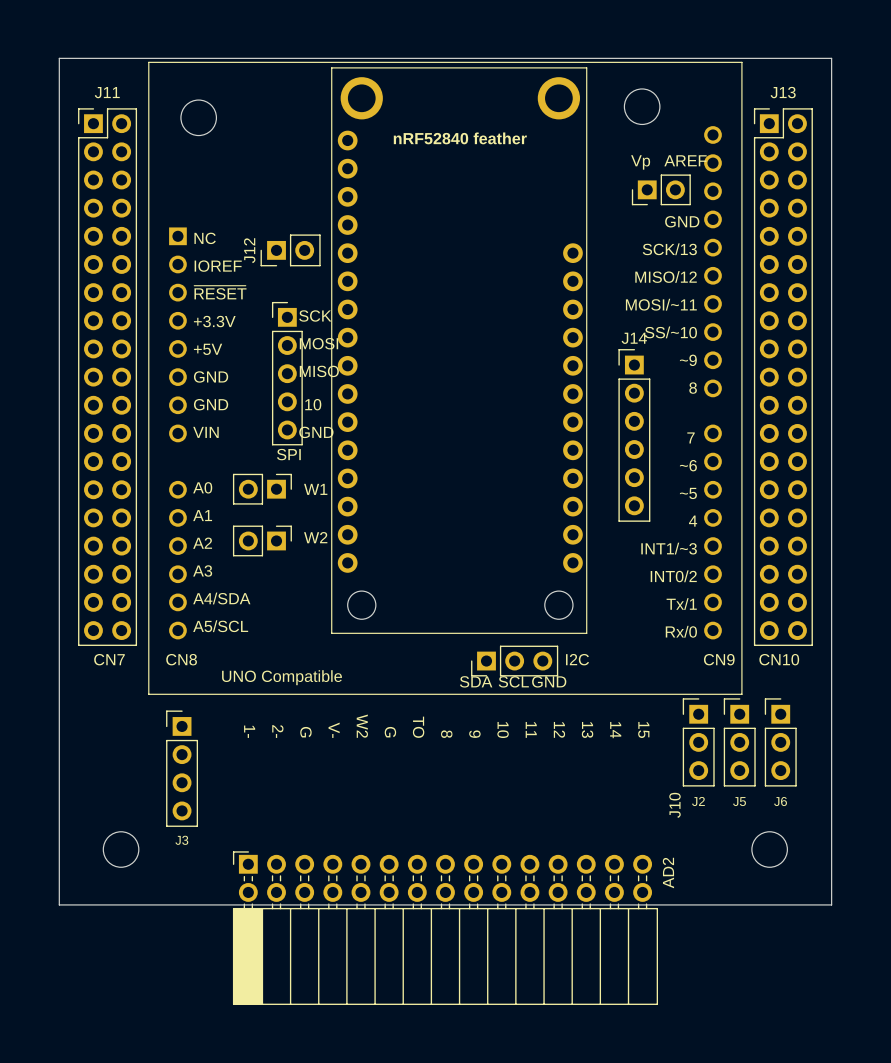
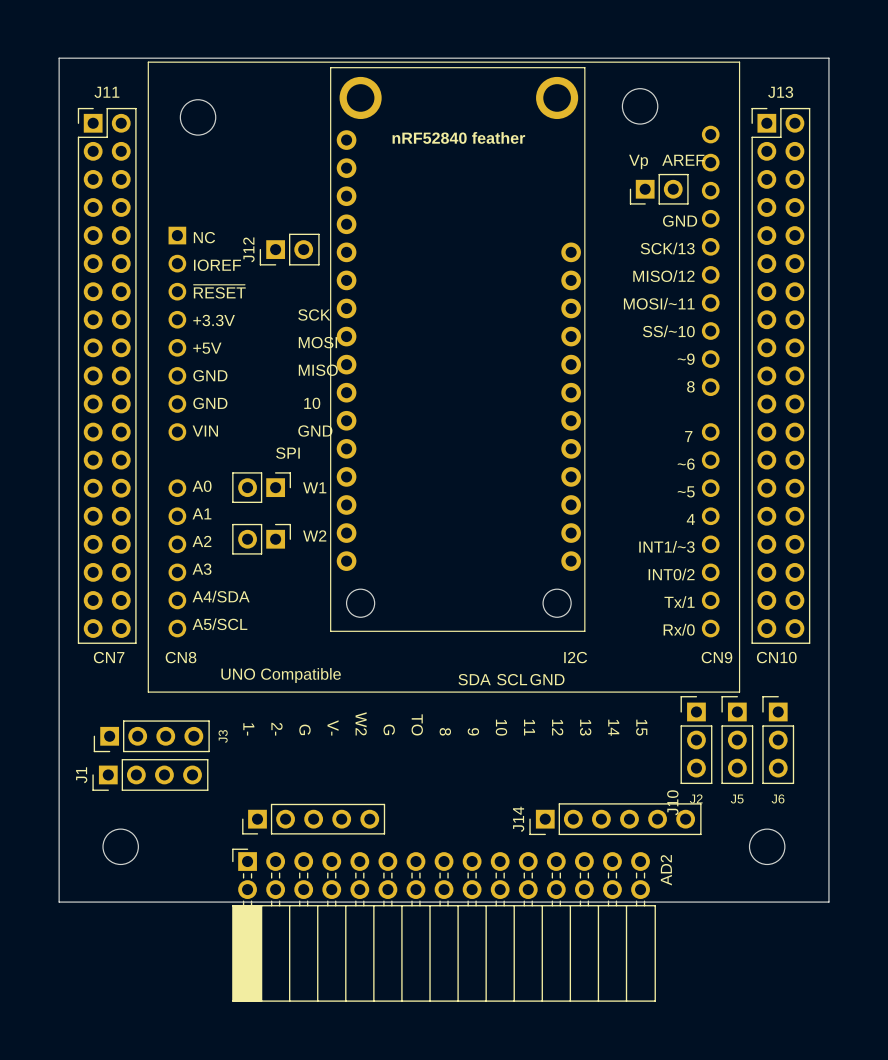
part: (287, 373) -> none
J14 rotation: 0° (634, 435) -> 90° counterclockwise (615, 819)
J14 position: (634, 435) -> (615, 819)
part: (514, 661) -> none
J3 rotation: 0° (182, 768) -> 90° counterclockwise (151, 736)
J1: none -> (150, 774)
part: none -> (313, 819)

